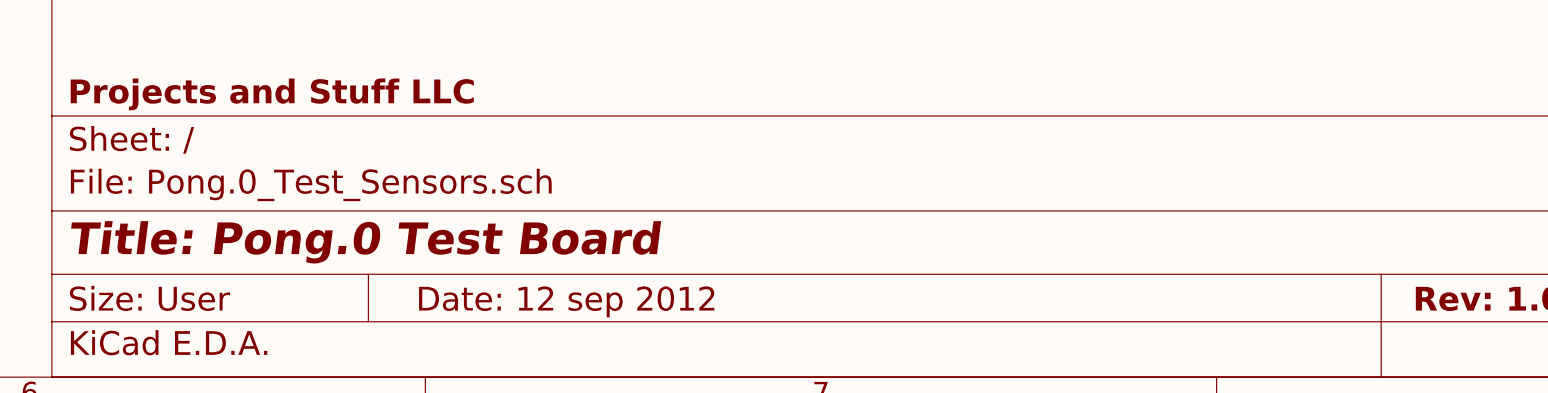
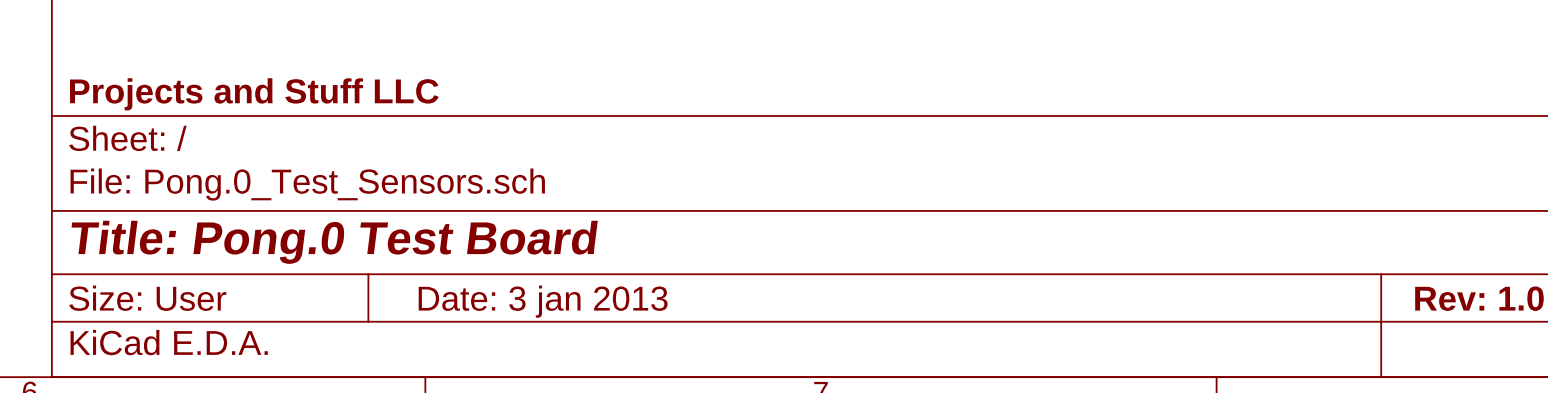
title block: Date: 12 sep 2012 (566, 301) -> Date: 3 jan 2013 (543, 301)

